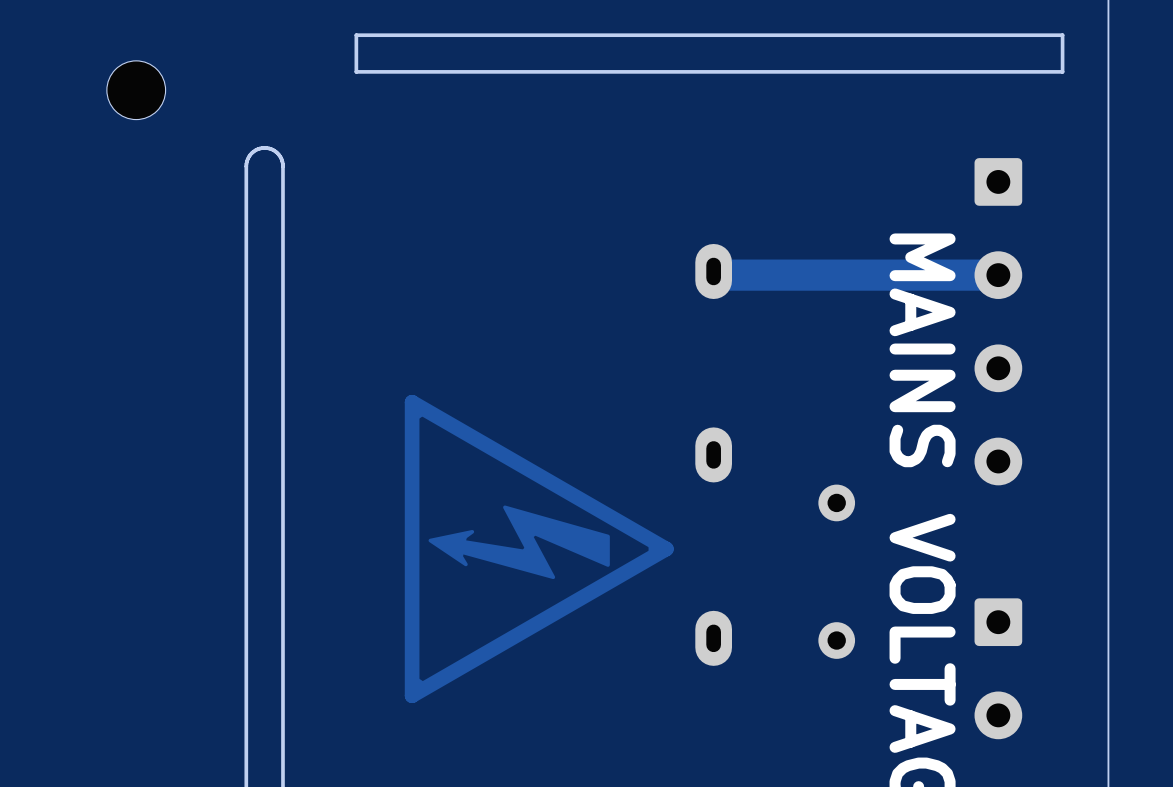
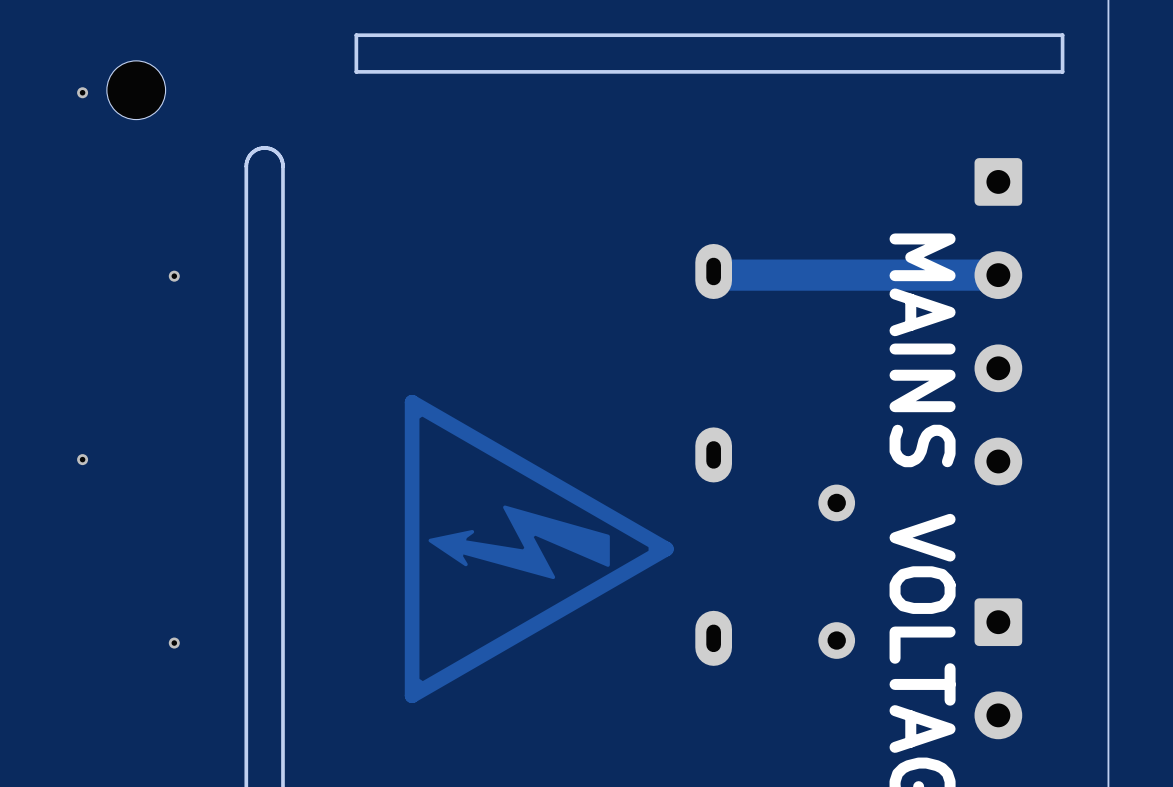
via: none -> (82, 92)
via: none -> (174, 276)
via: none -> (82, 459)
via: none -> (174, 643)

